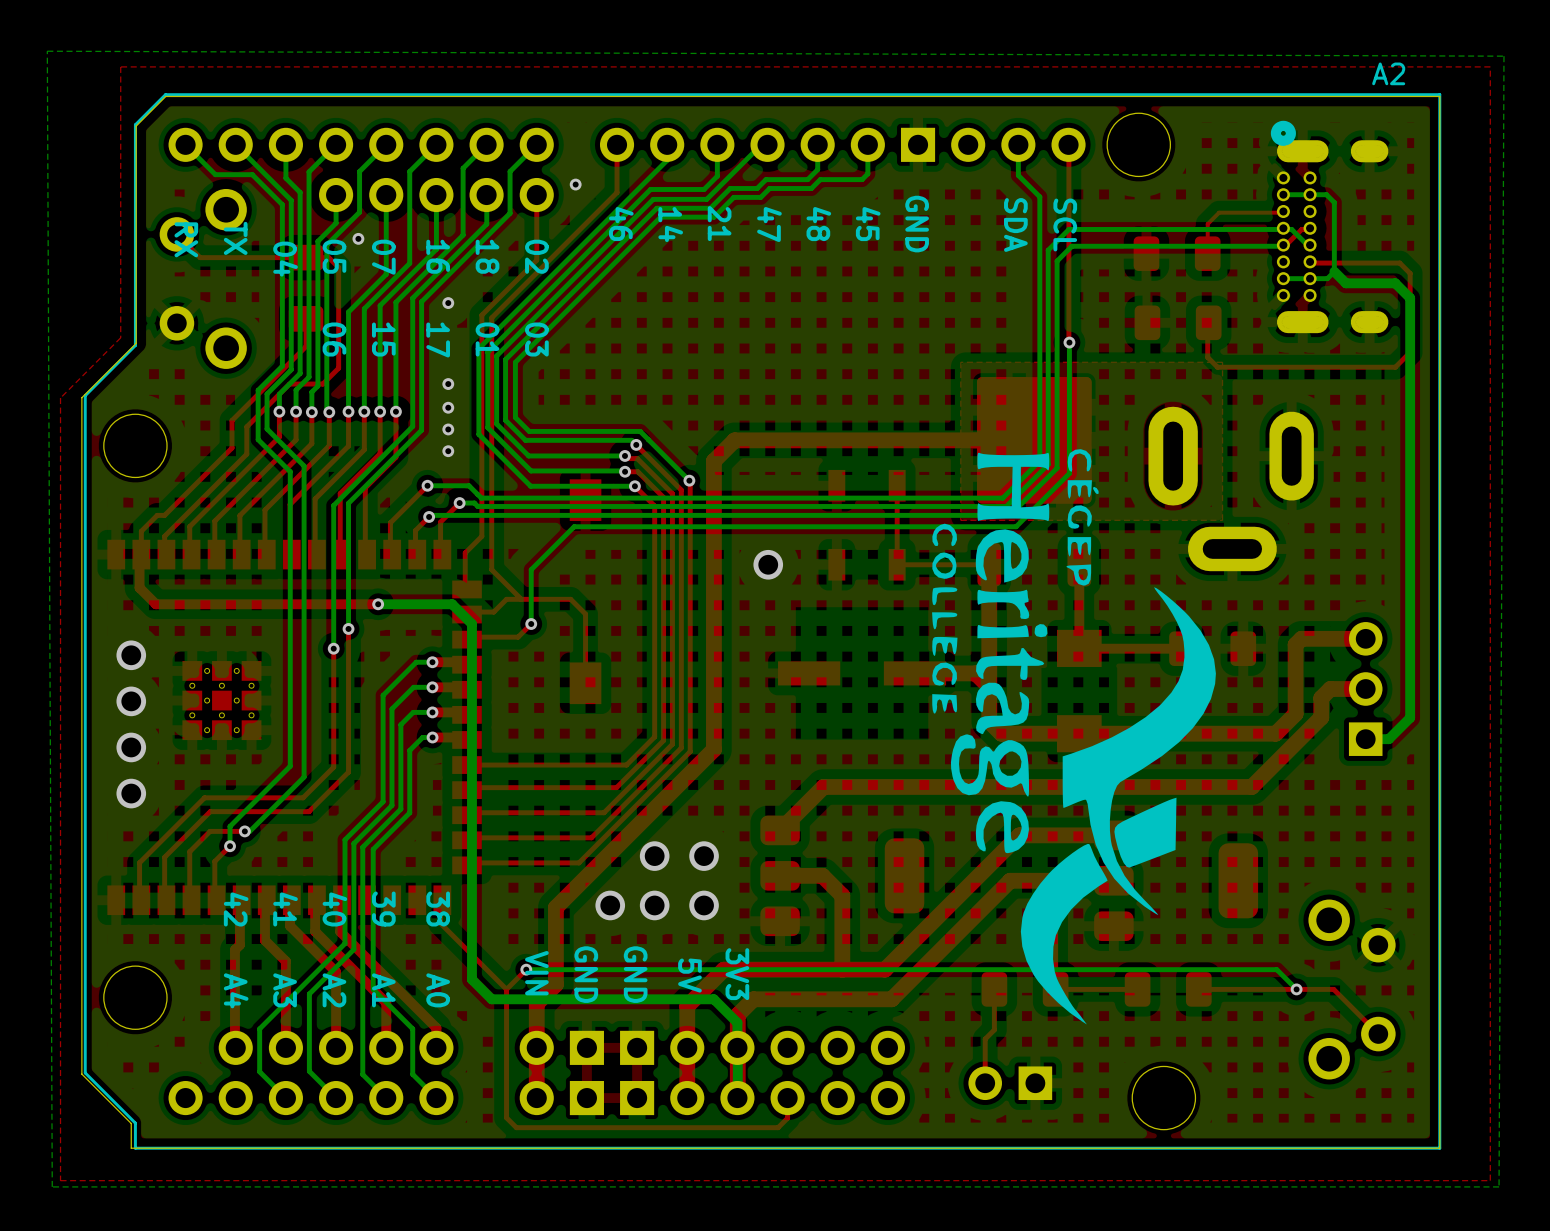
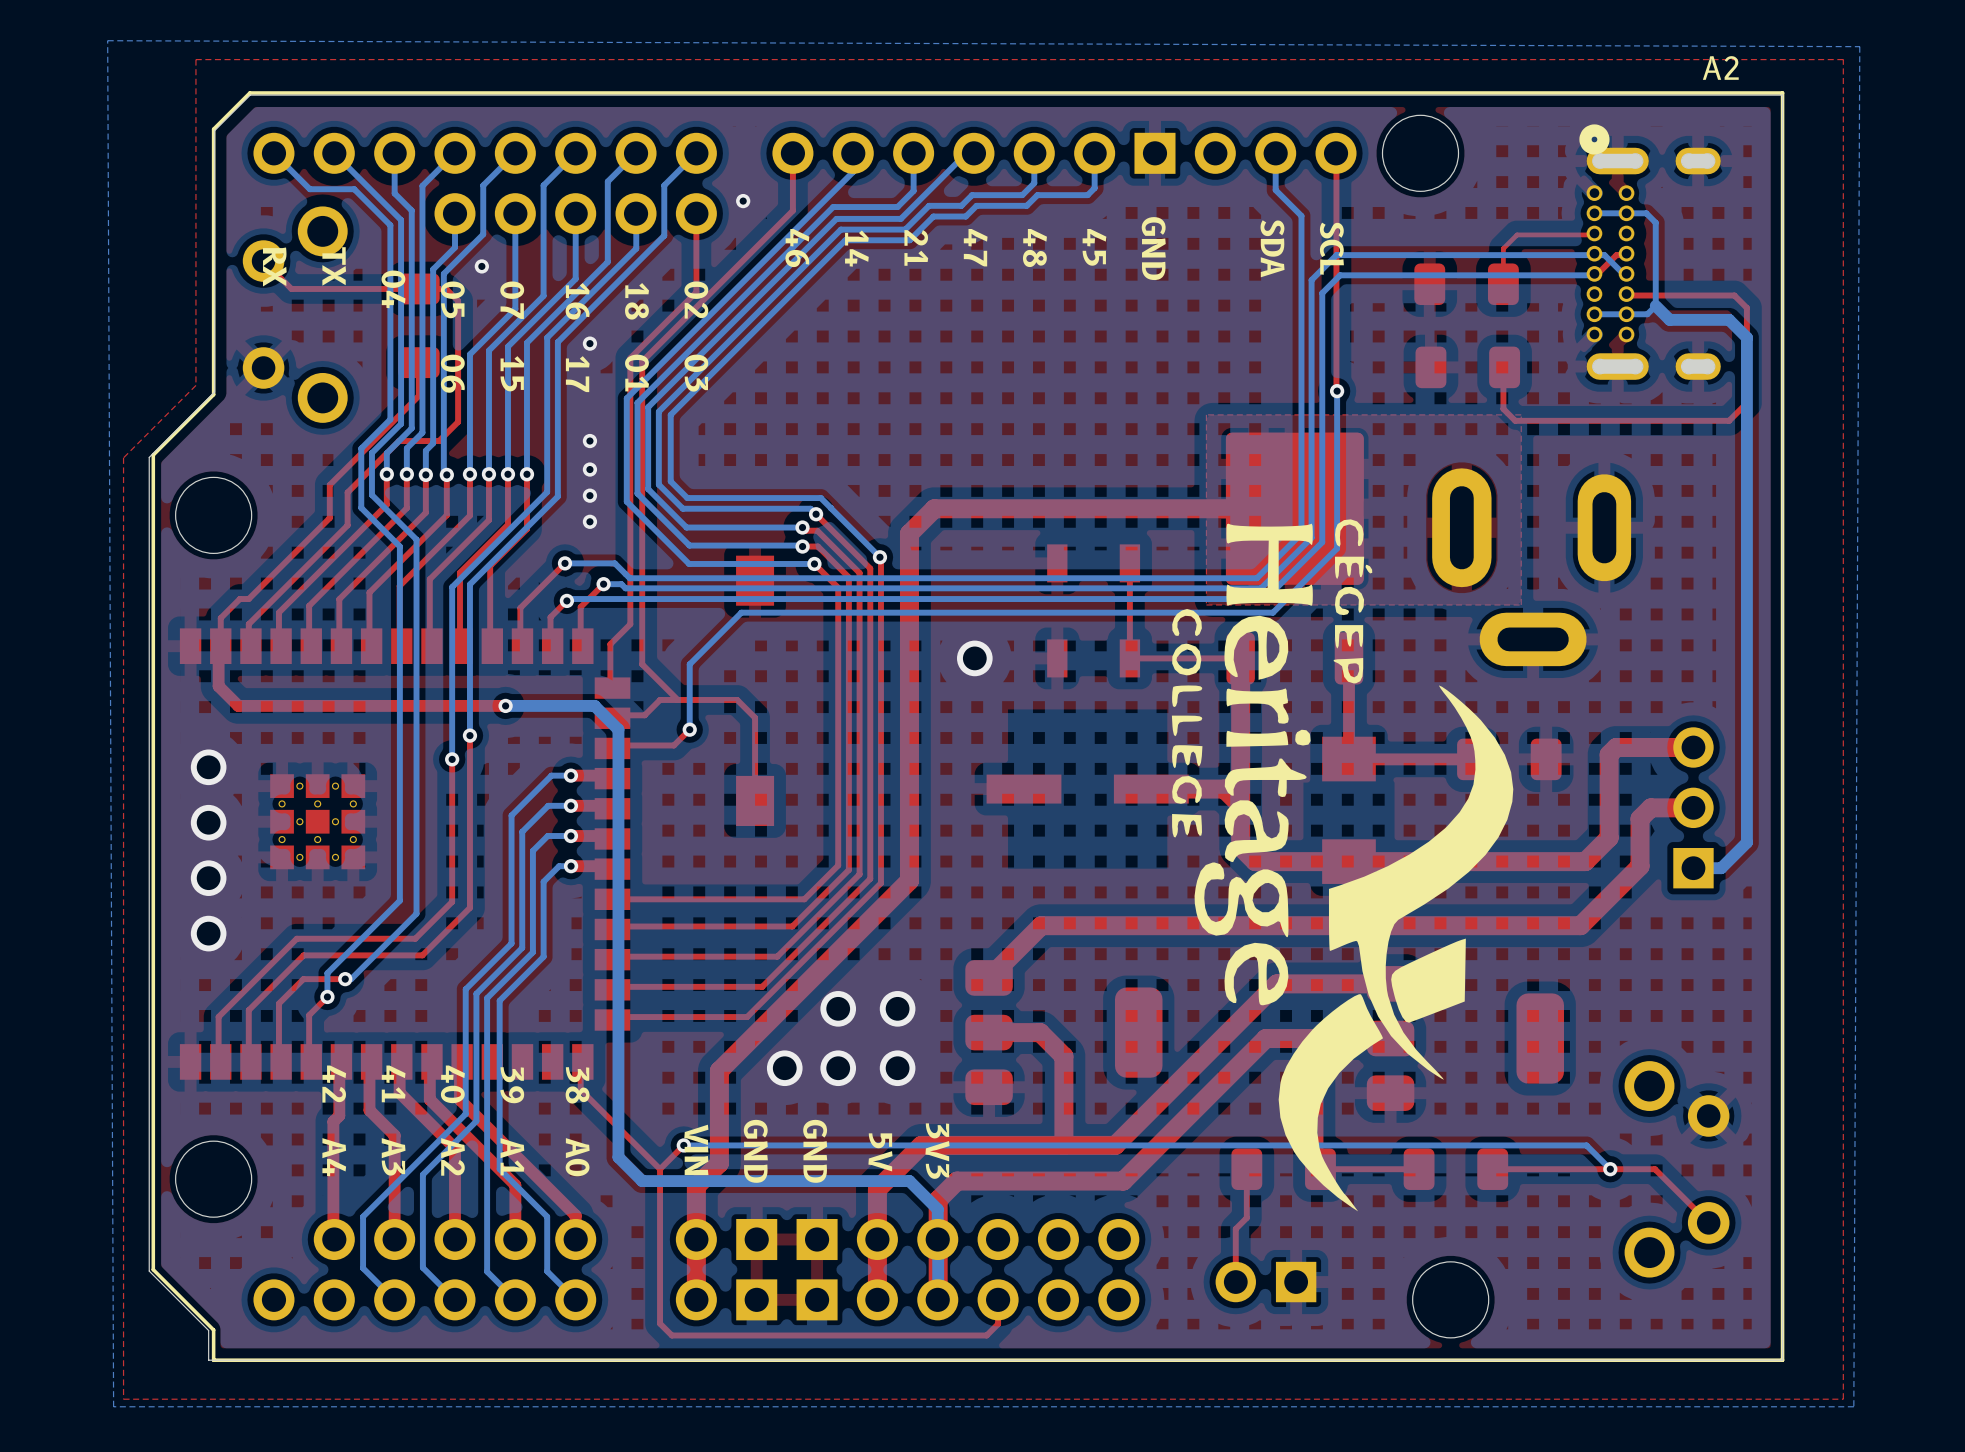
top track: (1321, 717) (1251, 786) -> (1640, 842) (1640, 866) (1580, 925) (1556, 925)

